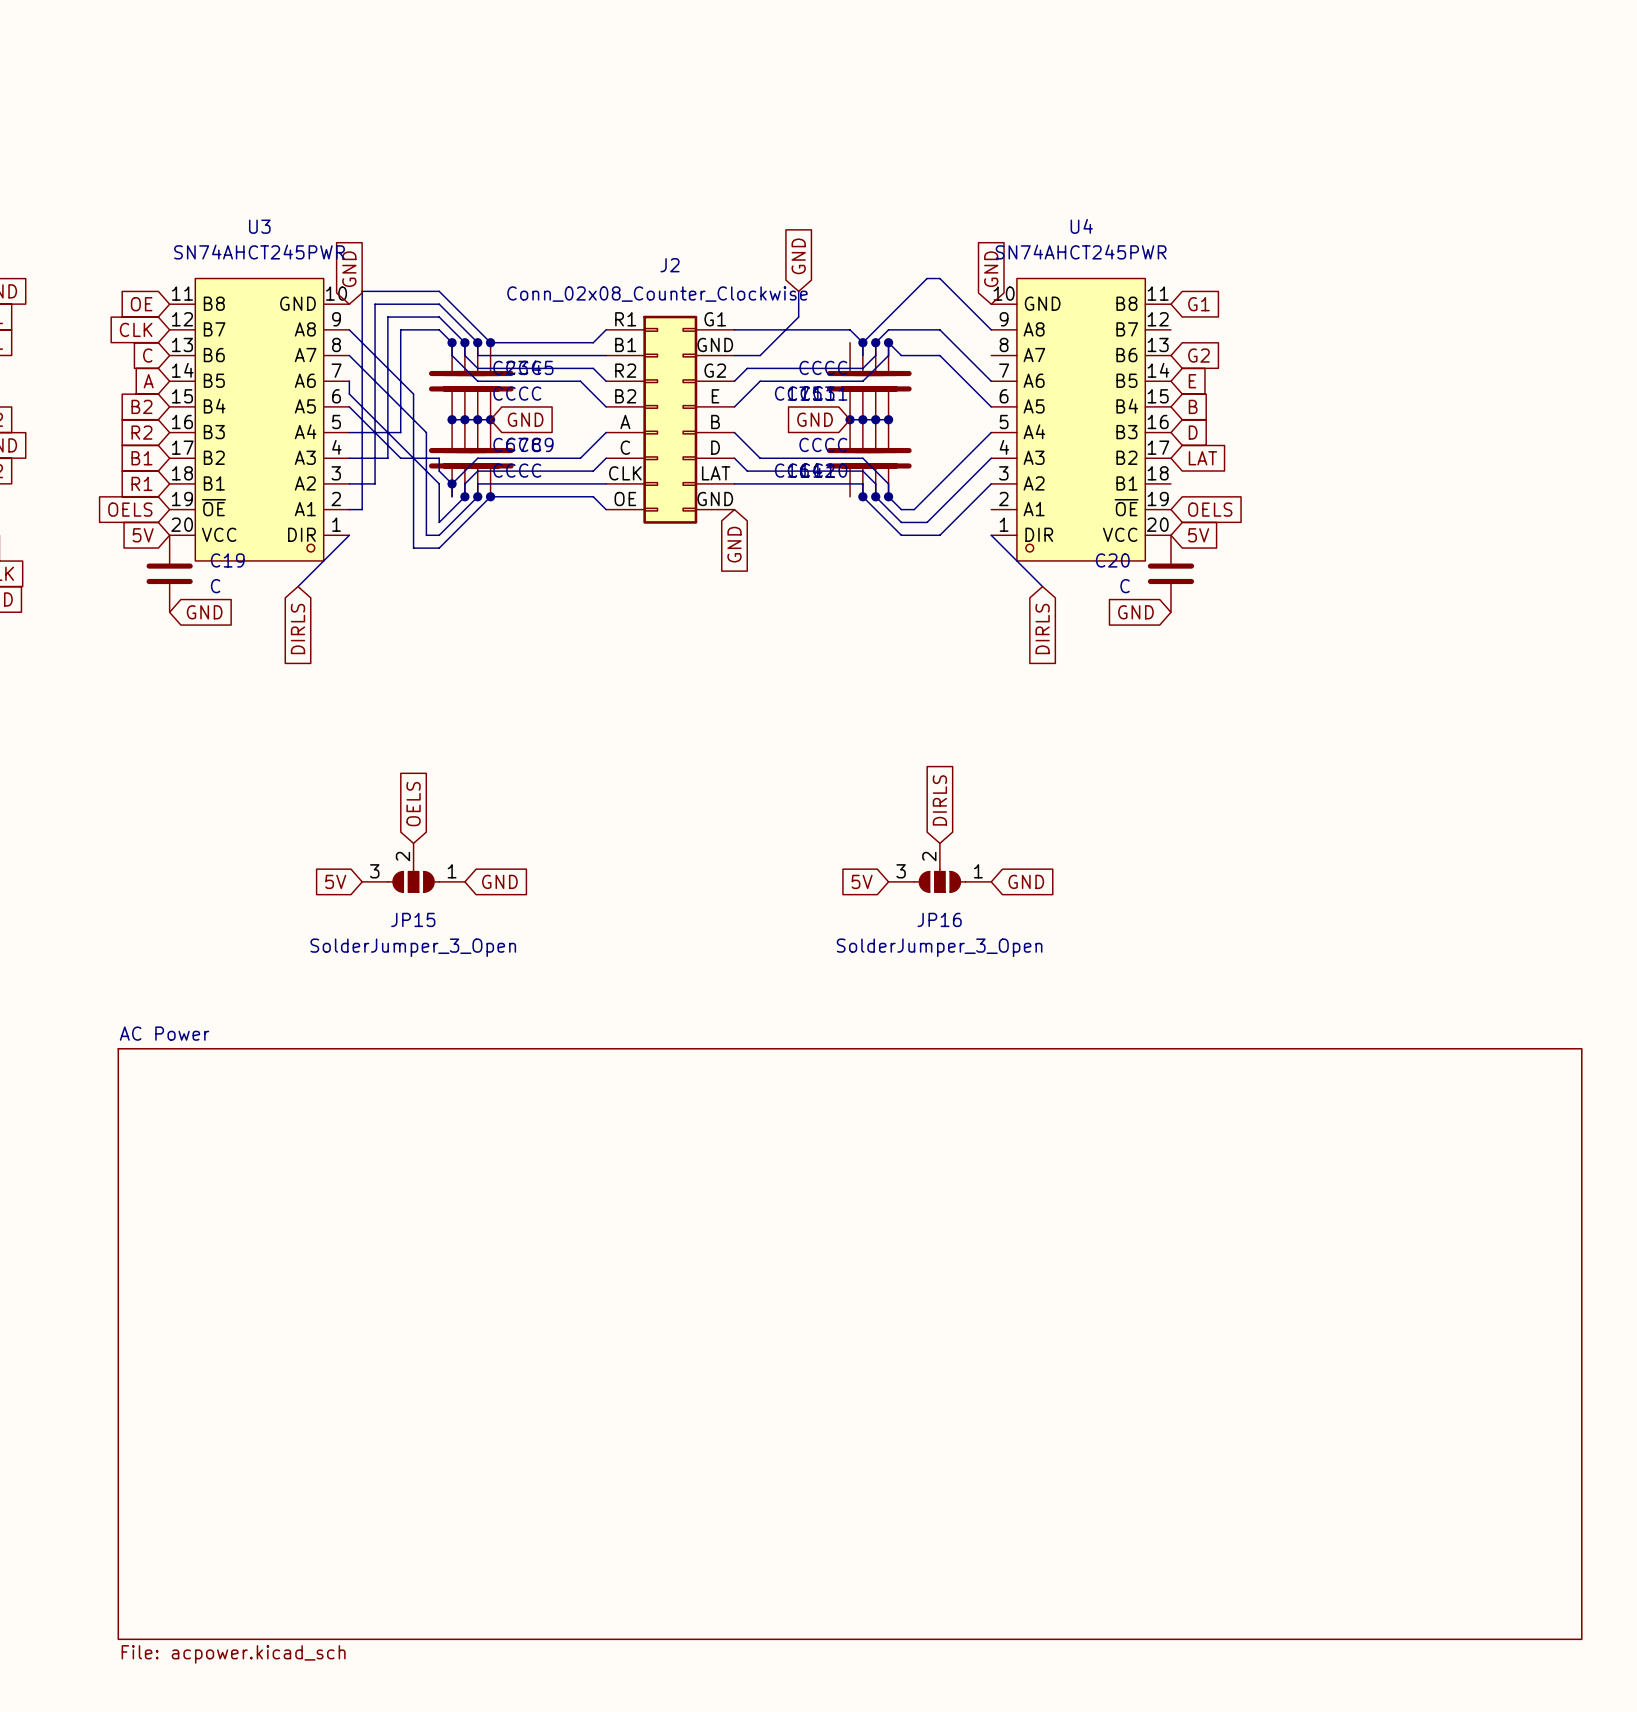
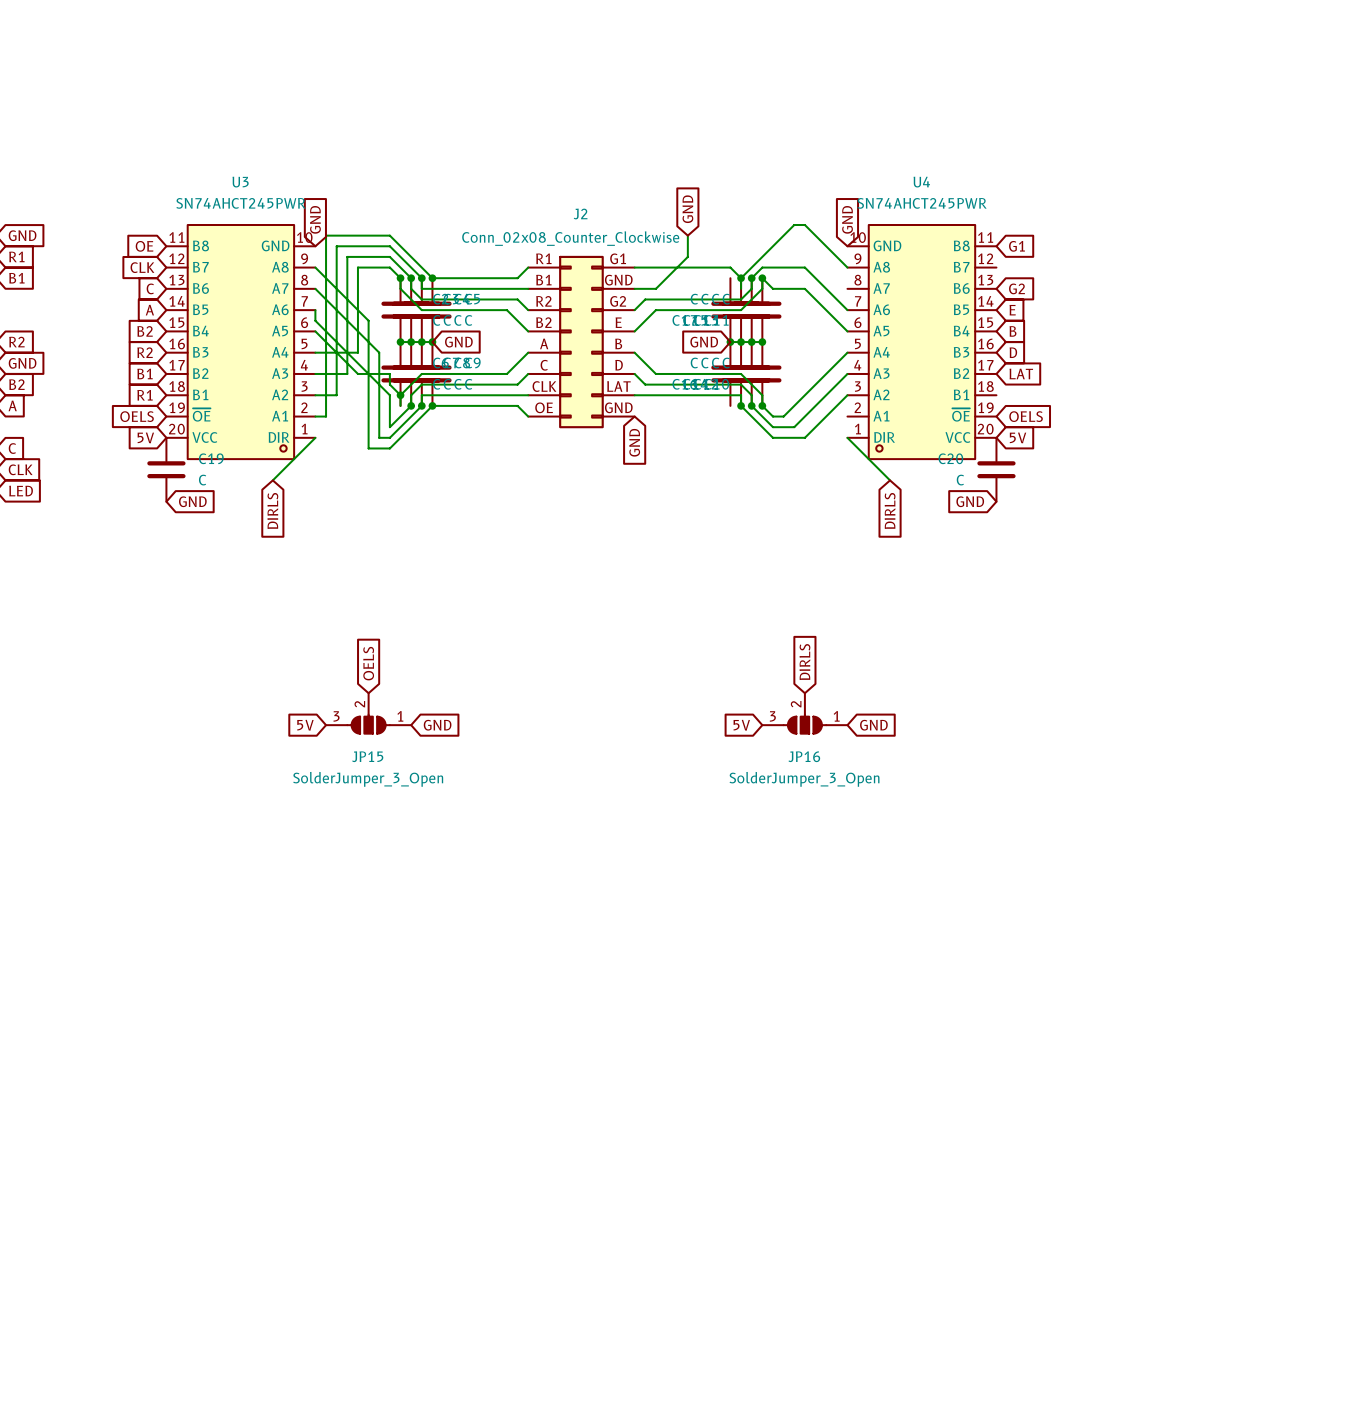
sheet AC Power: File: acpower.kicad_sch (850, 1344) -> none

